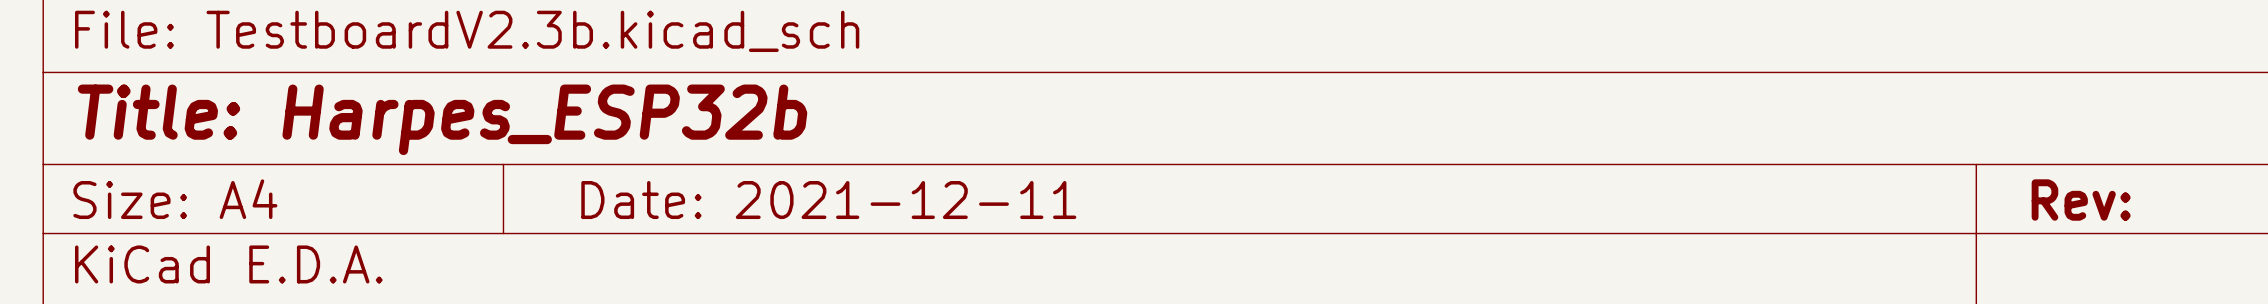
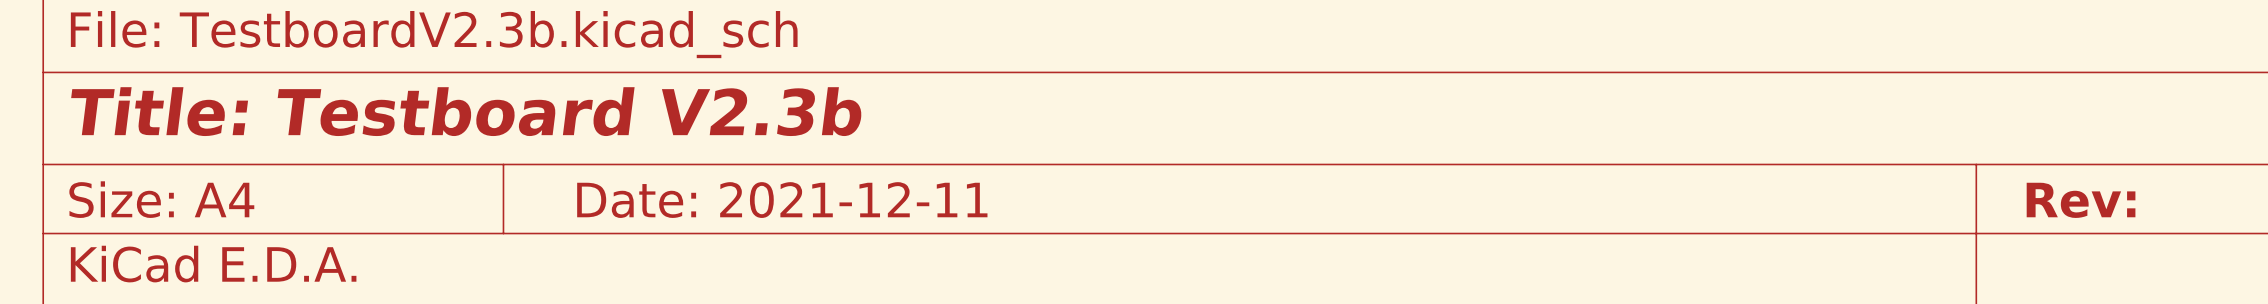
title block: Title: Harpes_ESP32b (442, 119) -> Title: Testboard V2.3b (466, 111)

